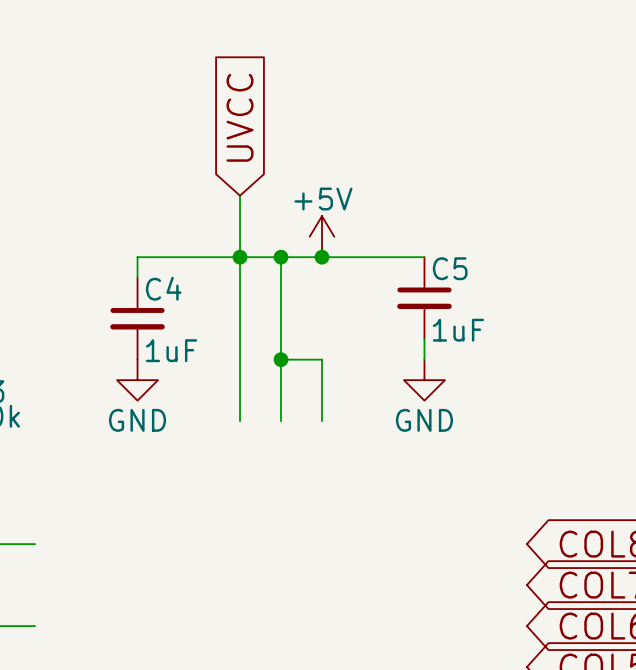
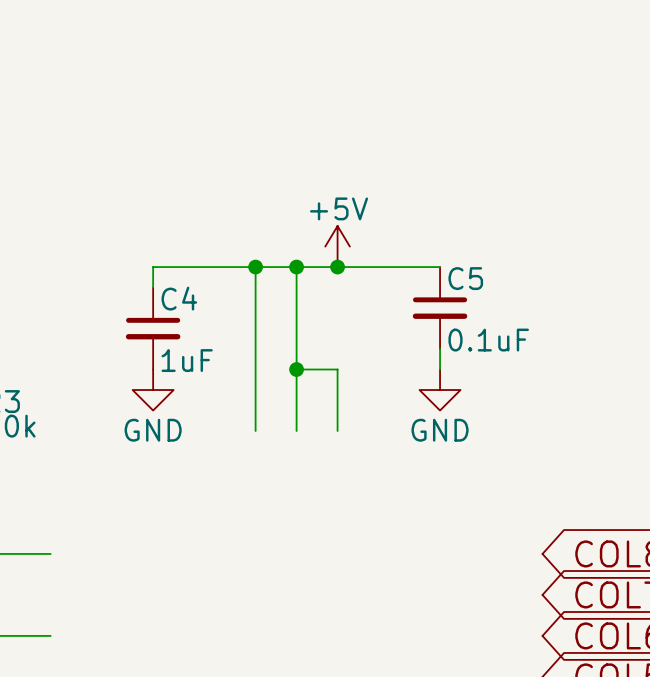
global label: UVCC (240, 117) -> none
wire: (240, 195) (240, 257) -> none
C5 value: 1uF (458, 330) -> 0.1uF (488, 340)

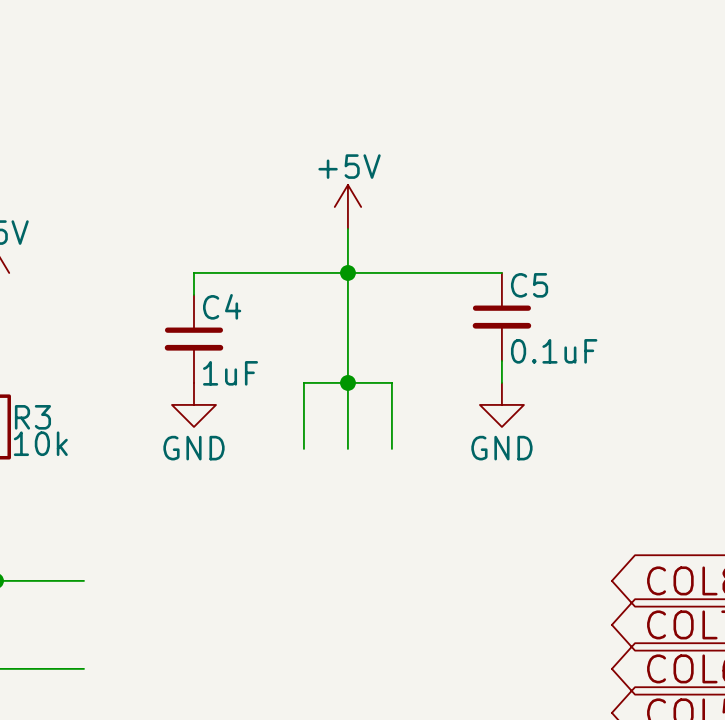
wire: none -> (347, 228) (347, 272)
power symbol position: +5V (337, 246) -> +5V (347, 206)
wire: (255, 267) (255, 369) -> (347, 382) (303, 382)
junction: (255, 267) -> none
junction: (337, 267) -> none

